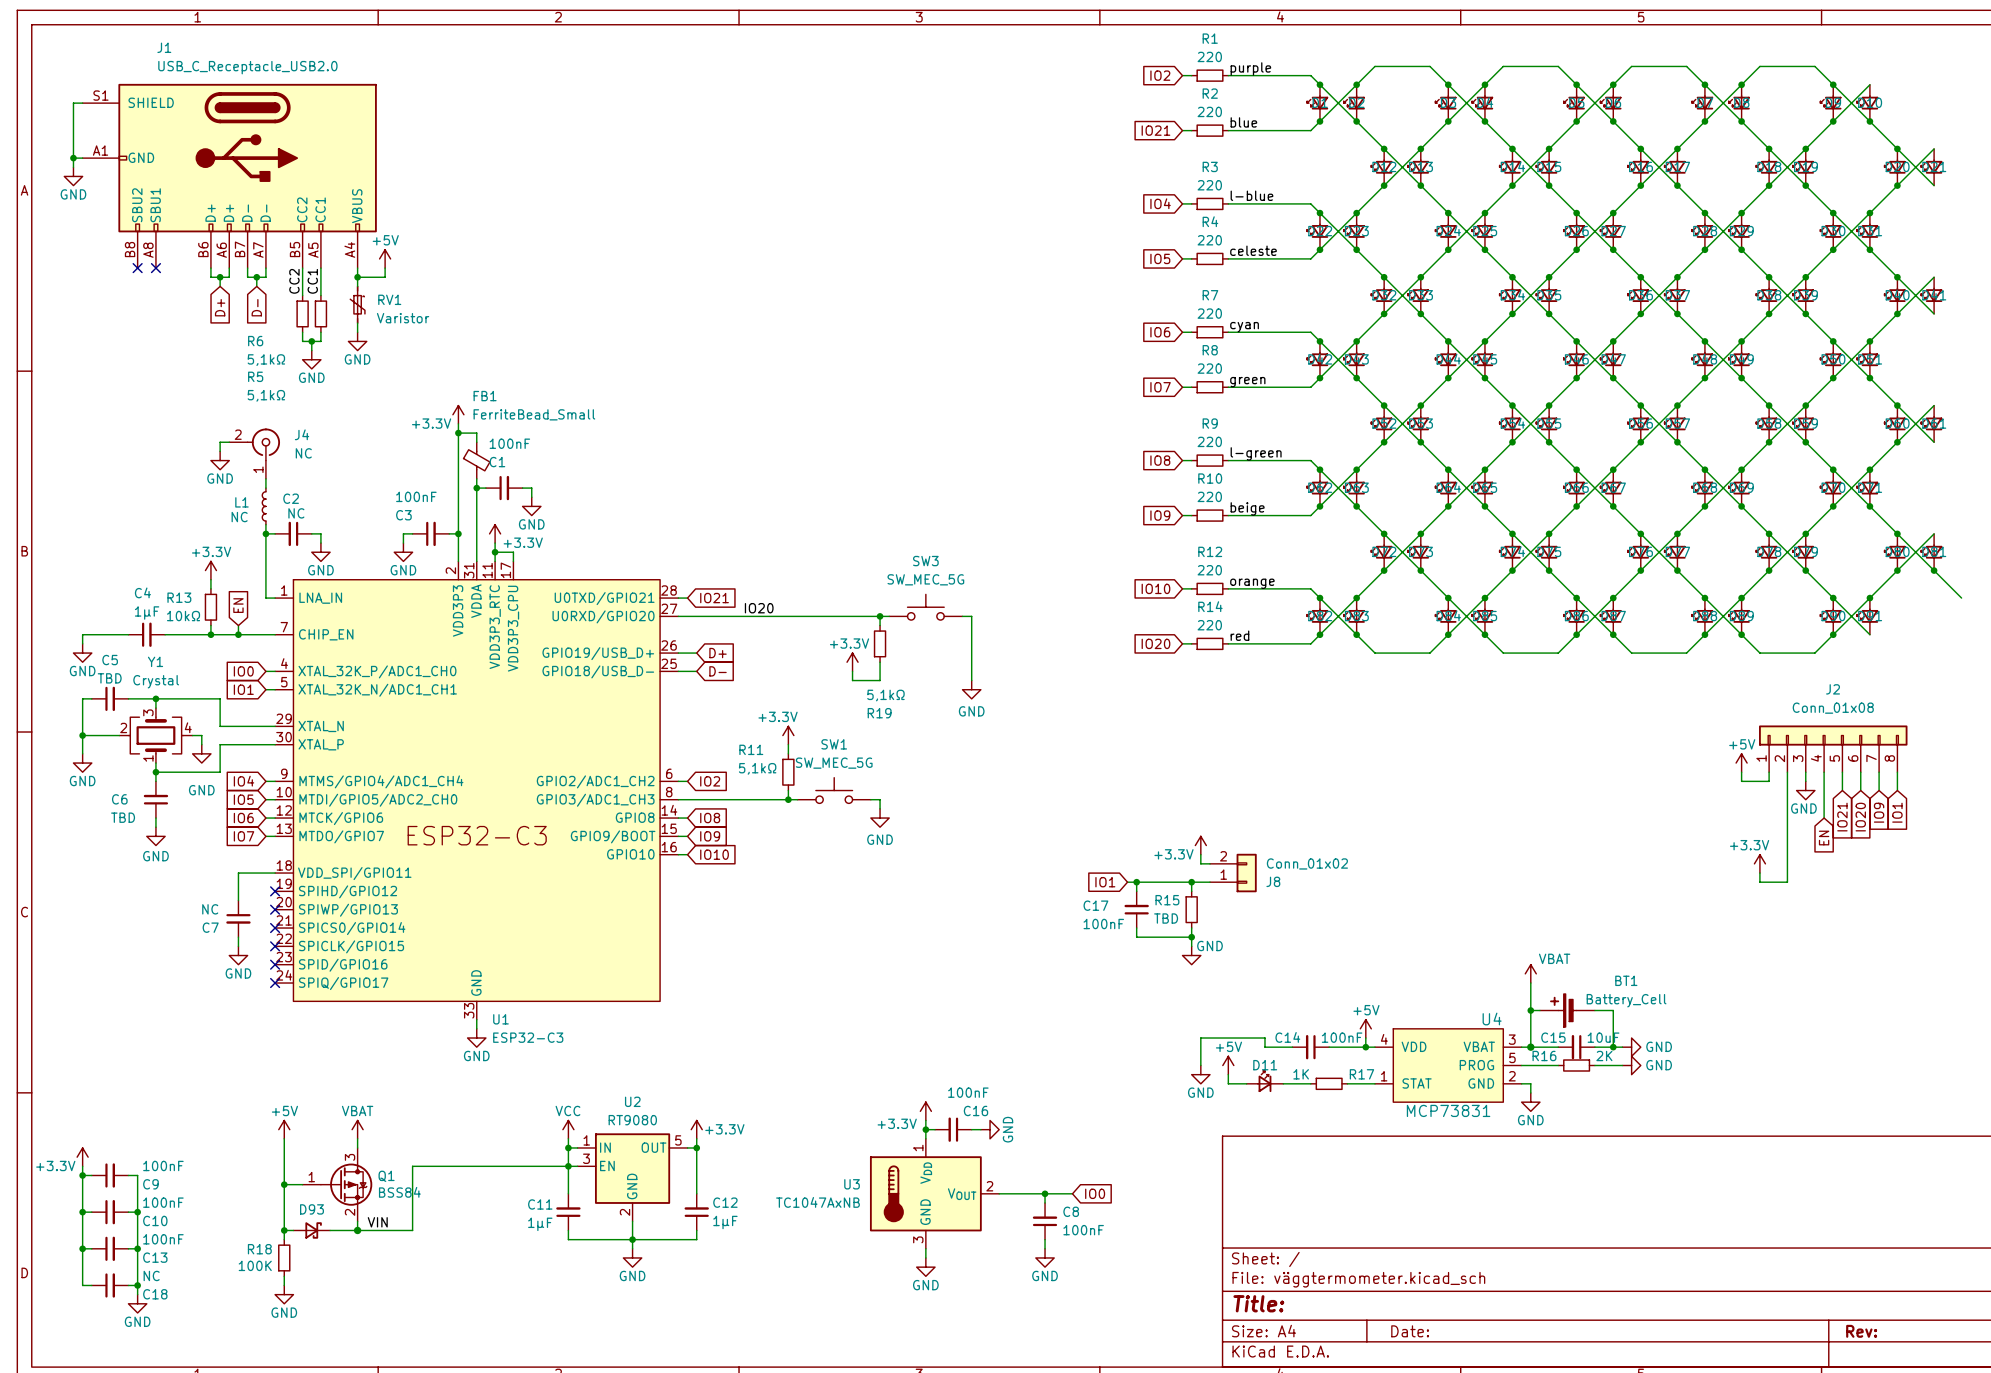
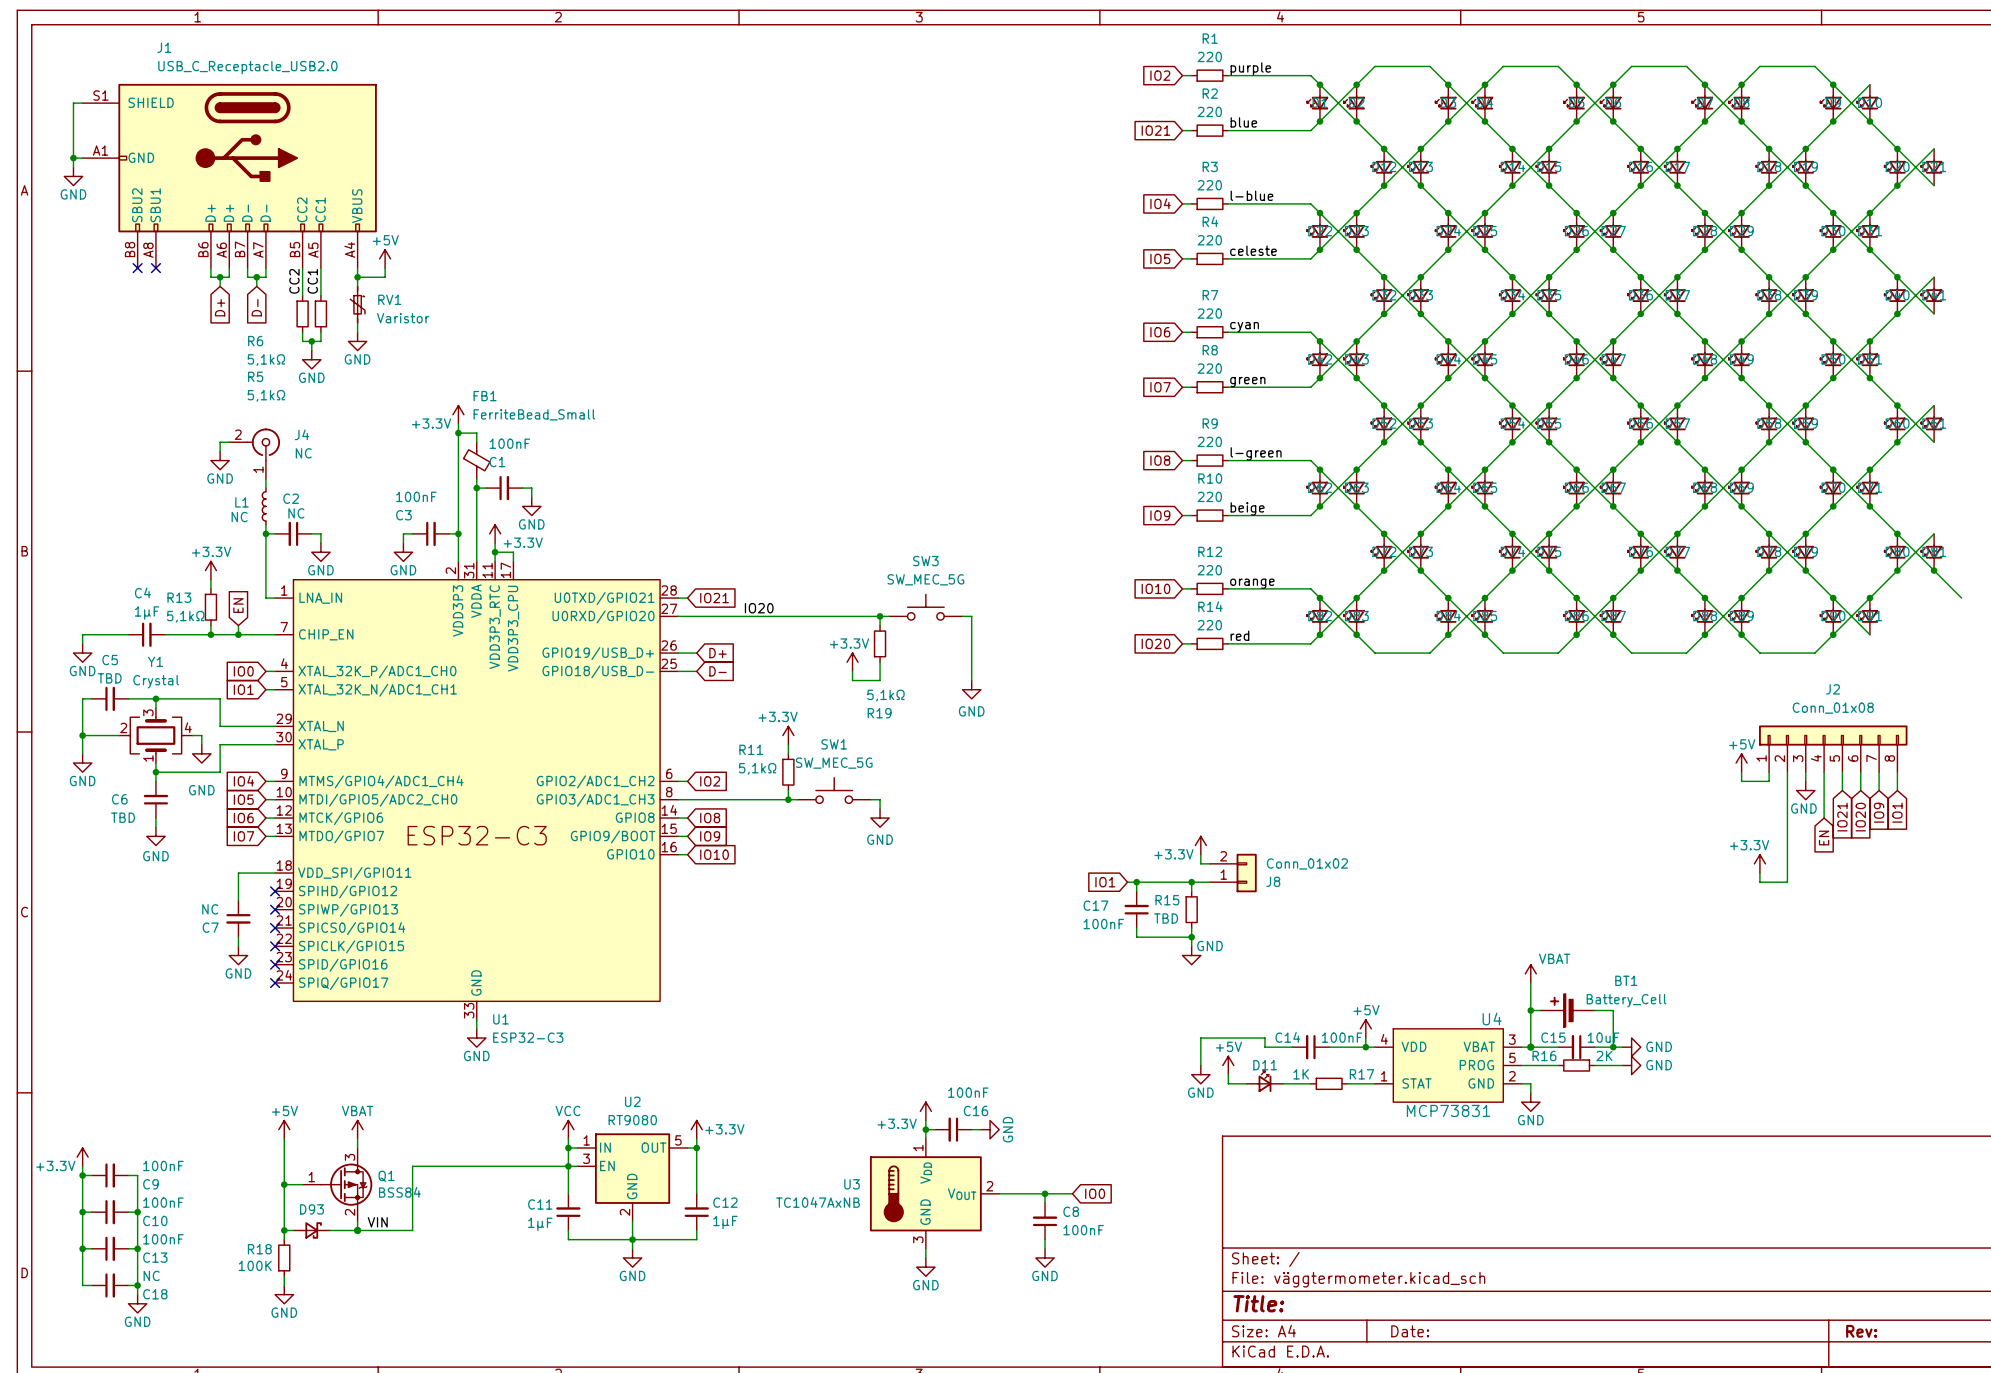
R13 value: 10kΩ (183, 616) -> 5,1kΩ (185, 616)

